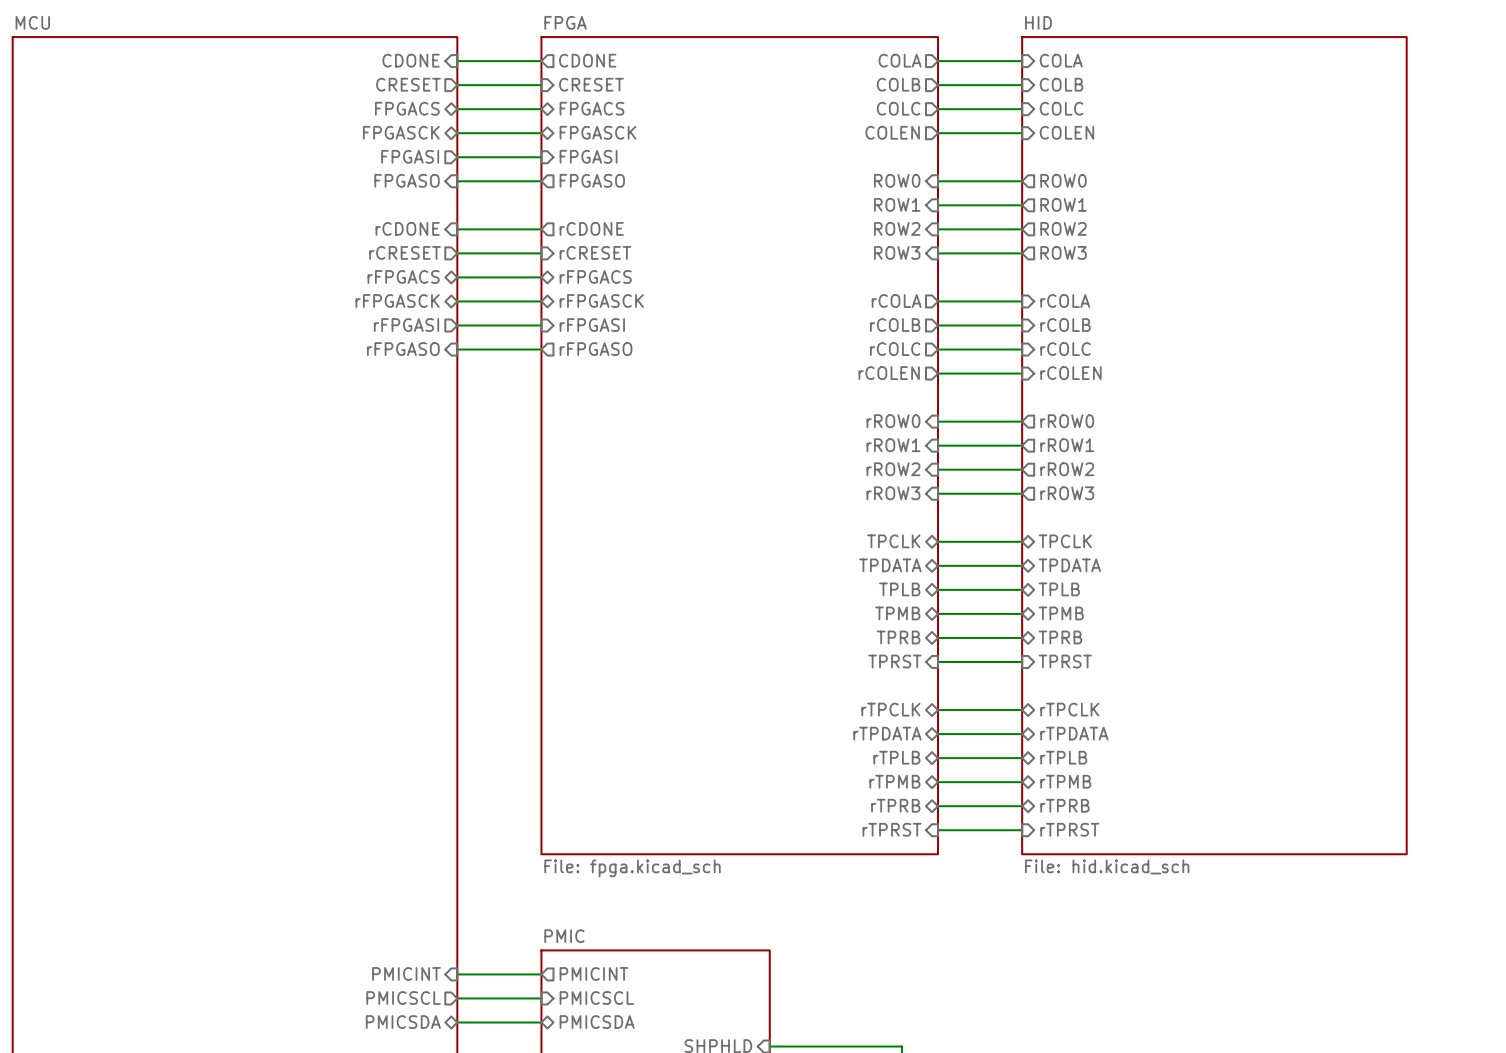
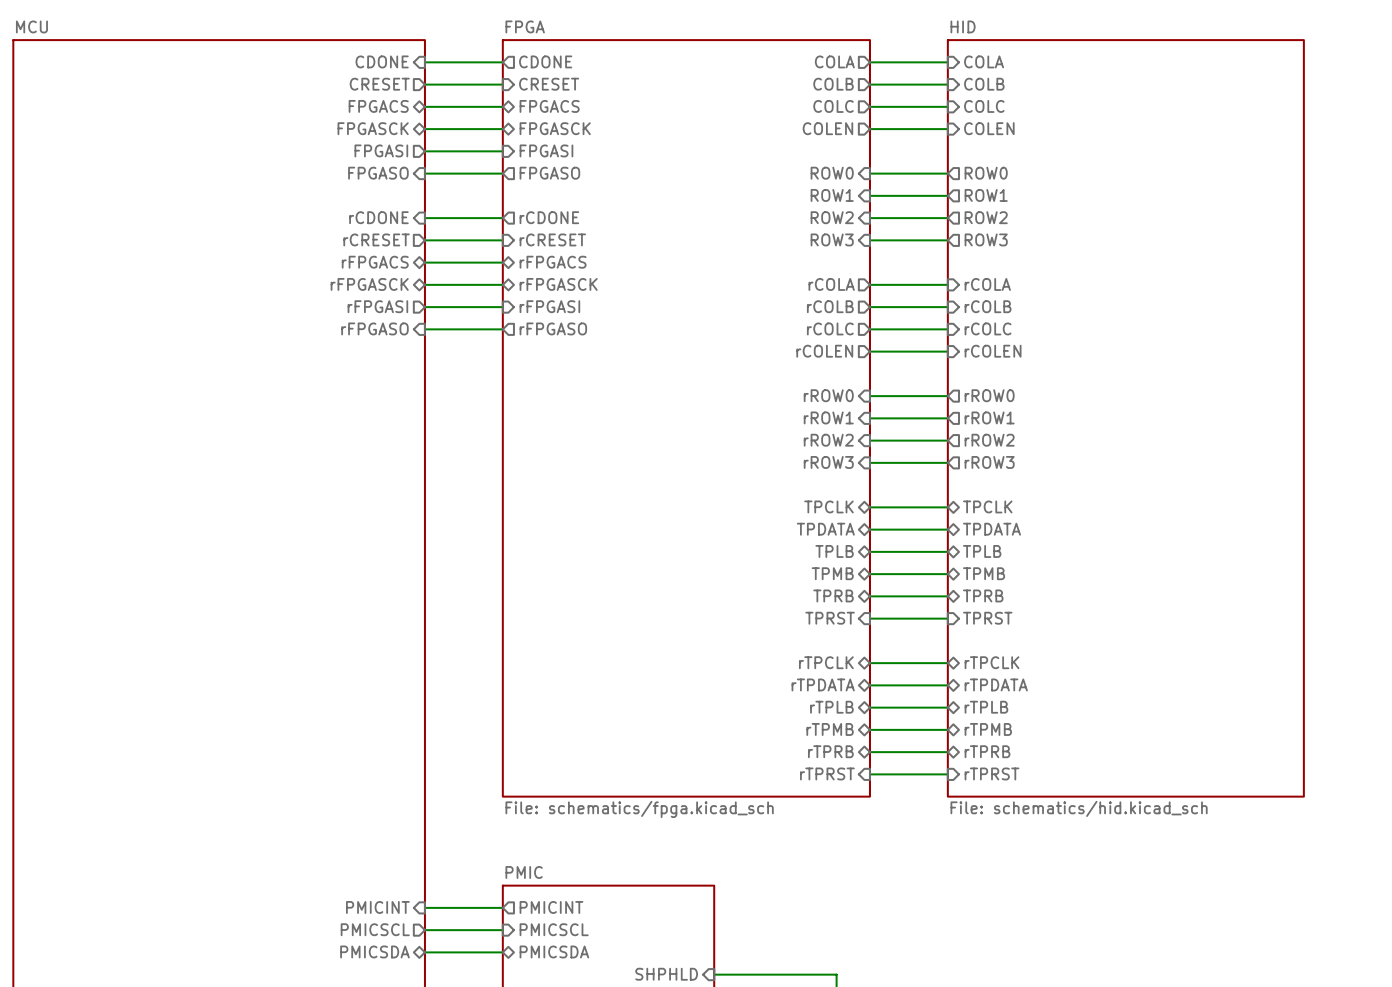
sheet HID value: File: hid.kicad_sch (1107, 866) -> File: schematics/hid.kicad_sch (1079, 808)
sheet FPGA value: File: fpga.kicad_sch (632, 868) -> File: schematics/fpga.kicad_sch (639, 809)

